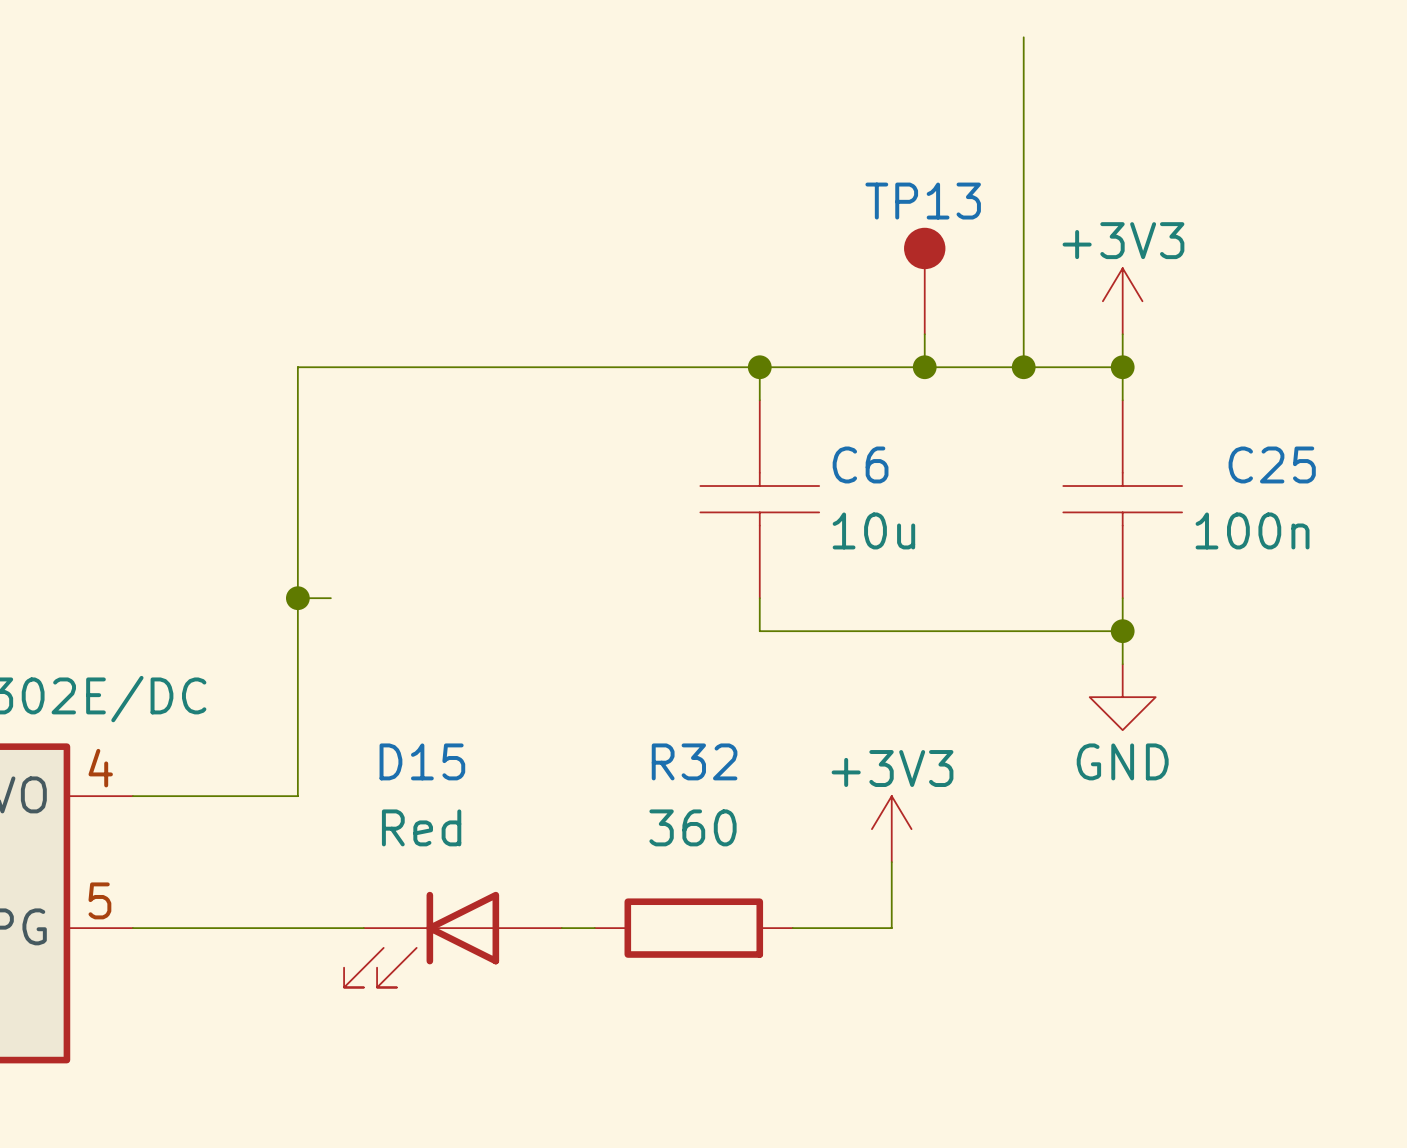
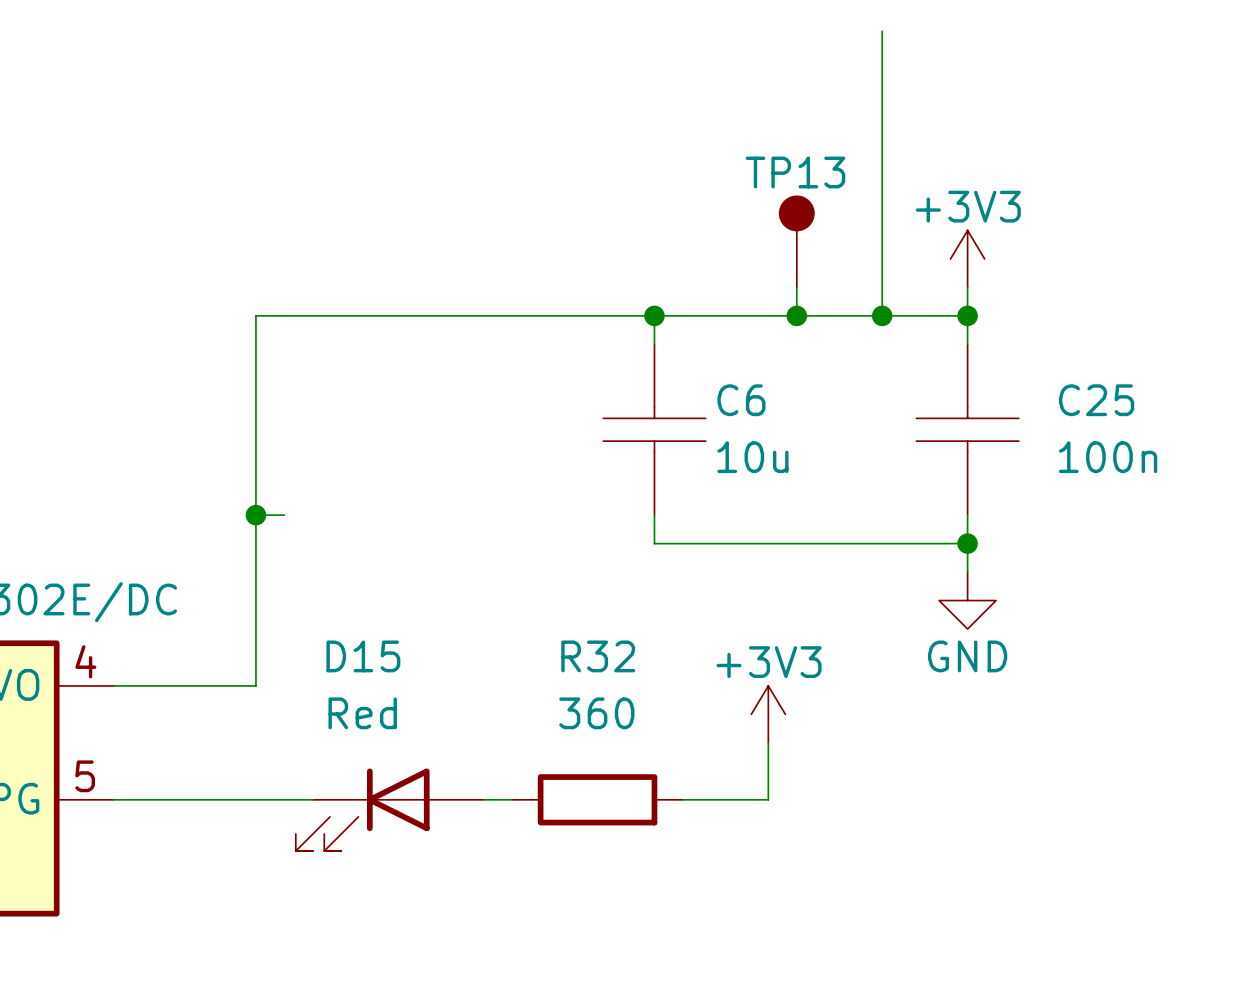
C25 value position: 100n (1252, 530) -> 100n (1108, 457)

